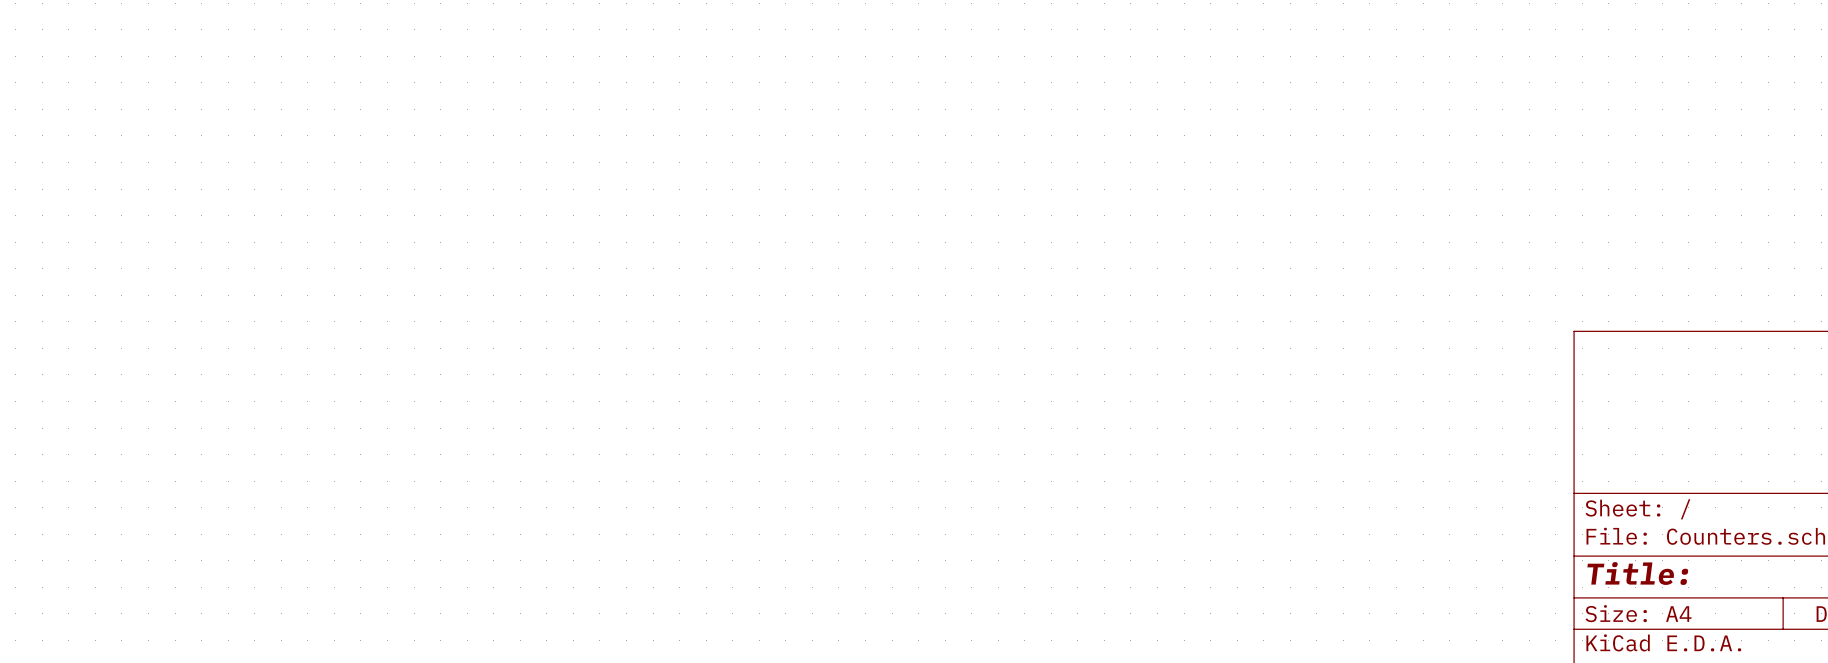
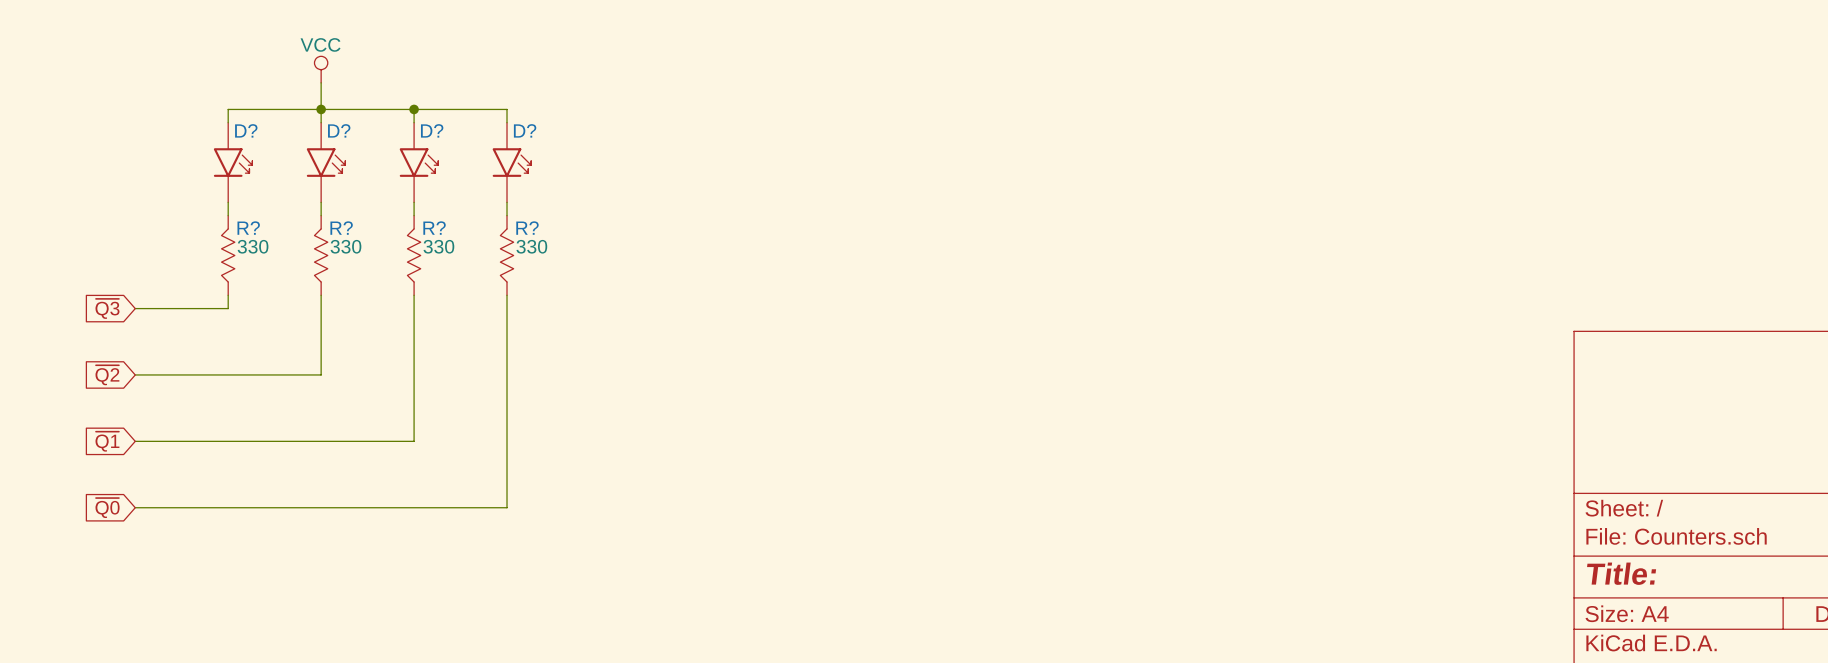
power symbol: none -> VCC (321, 69)
wire: none -> (321, 82) (321, 122)
junction: none -> (321, 109)
wire: none -> (414, 109) (414, 122)
junction: none -> (414, 109)
wire: none -> (228, 122) (228, 109) (507, 109) (507, 122)
D?: none -> (233, 162)
D?: none -> (326, 162)
D?: none -> (418, 162)
D?: none -> (511, 162)
wire: none -> (228, 202) (228, 215)
wire: none -> (321, 202) (321, 215)
wire: none -> (414, 202) (414, 215)
wire: none -> (507, 202) (507, 215)
R?: none -> 330 (228, 255)
R?: none -> 330 (321, 255)
R?: none -> 330 (414, 255)
R?: none -> 330 (507, 255)
wire: none -> (228, 295) (228, 308) (135, 308)
wire: none -> (321, 295) (321, 374) (135, 374)
wire: none -> (414, 295) (414, 441) (135, 441)
wire: none -> (507, 295) (507, 507) (135, 507)
global label: none -> ~{Q3} (107, 308)
global label: none -> ~{Q2} (107, 375)
global label: none -> ~{Q1} (107, 441)
global label: none -> ~{Q0} (107, 508)

